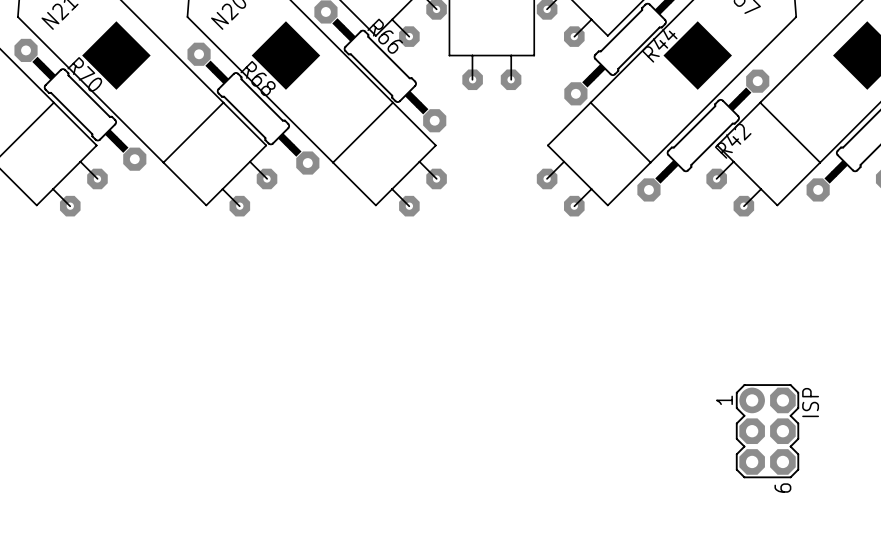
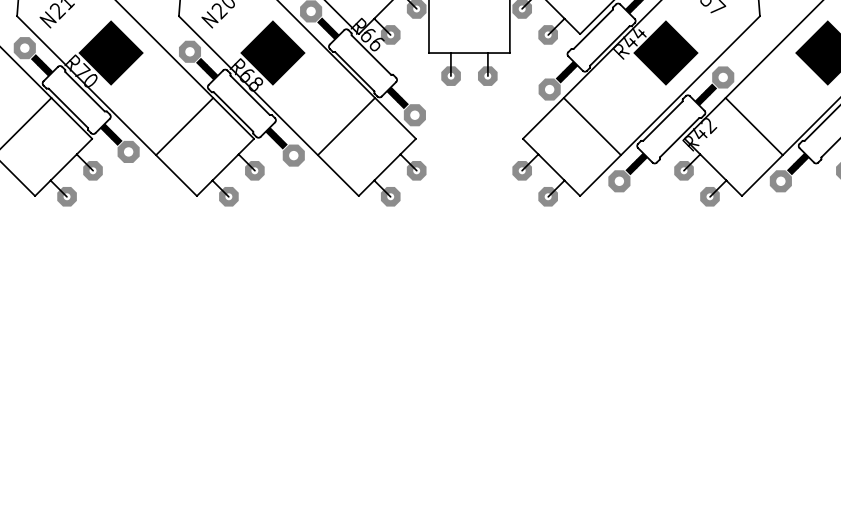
ISP: (767, 431) -> none

